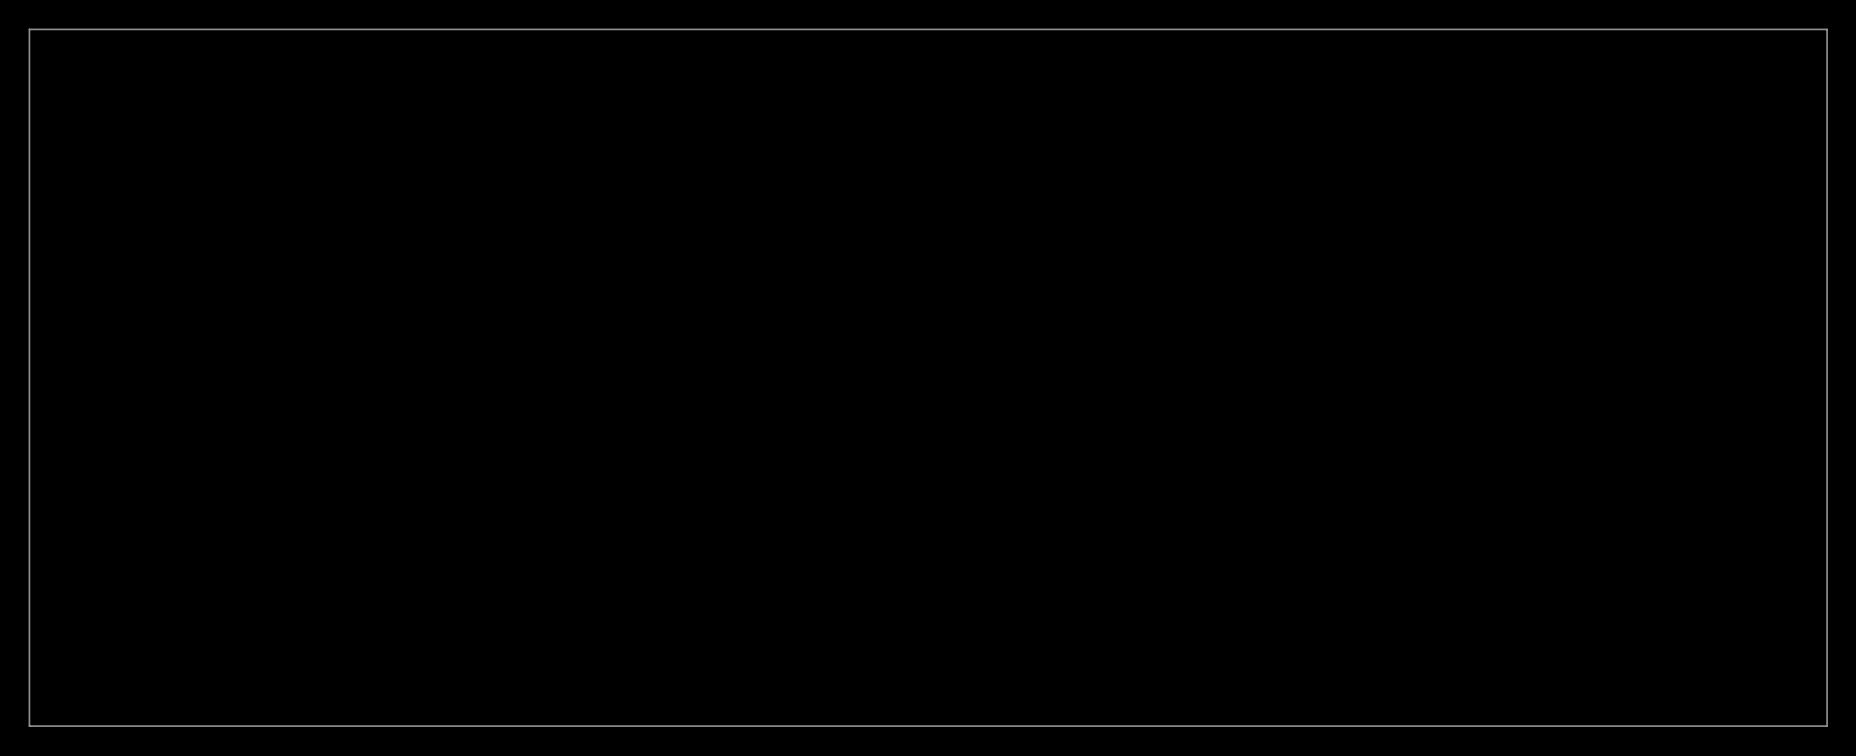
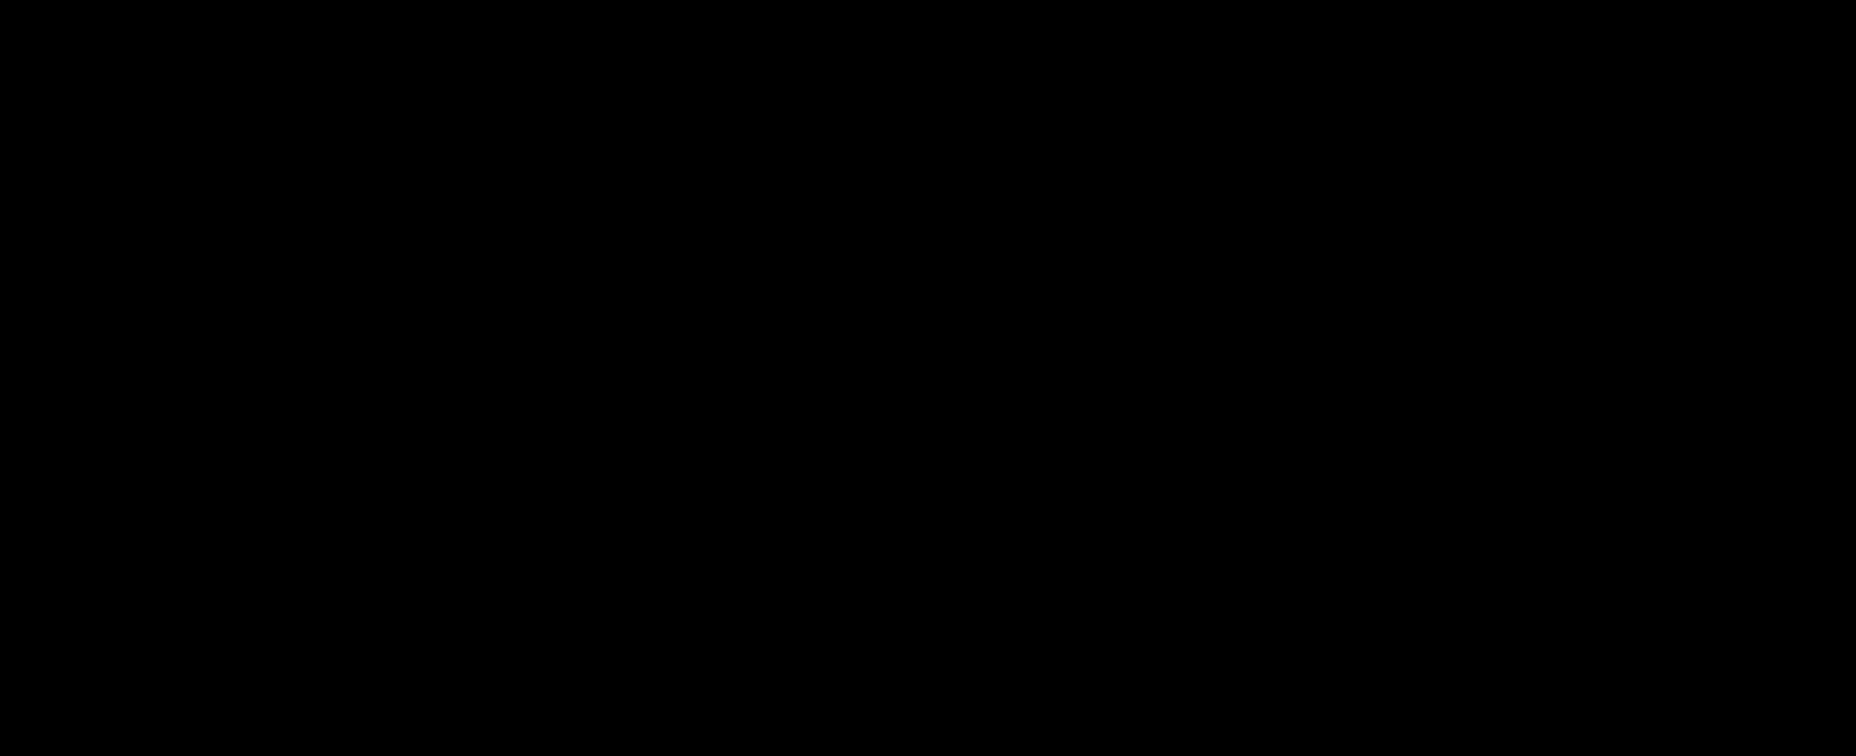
line: (29, 29) (1827, 29) (1827, 726) (29, 726) (29, 29) -> none

